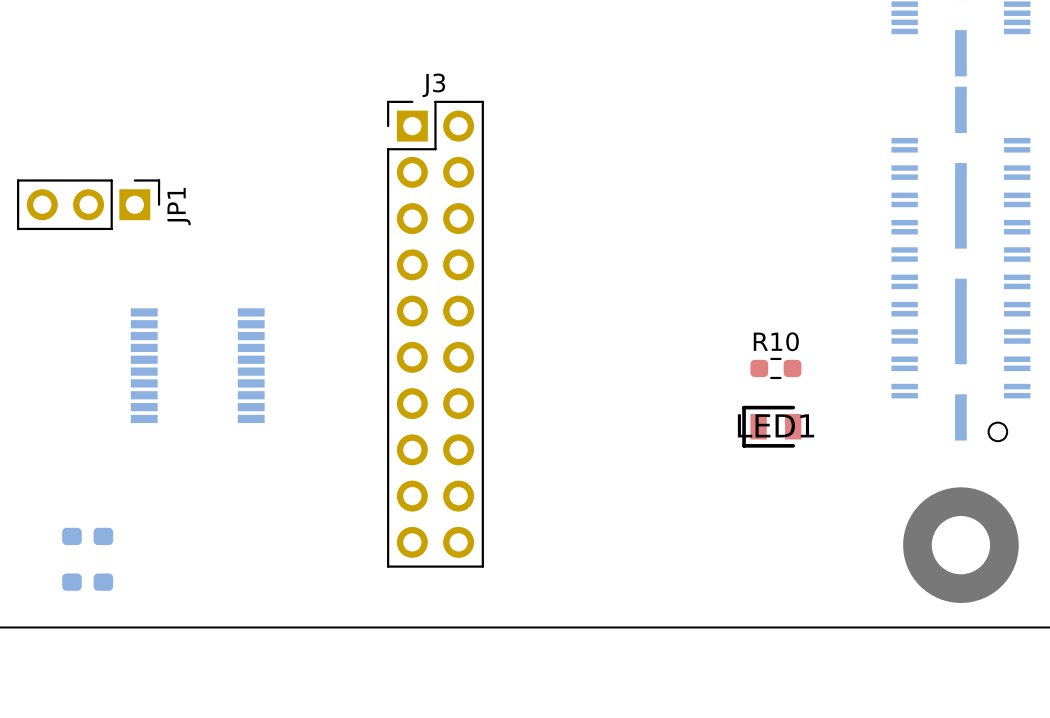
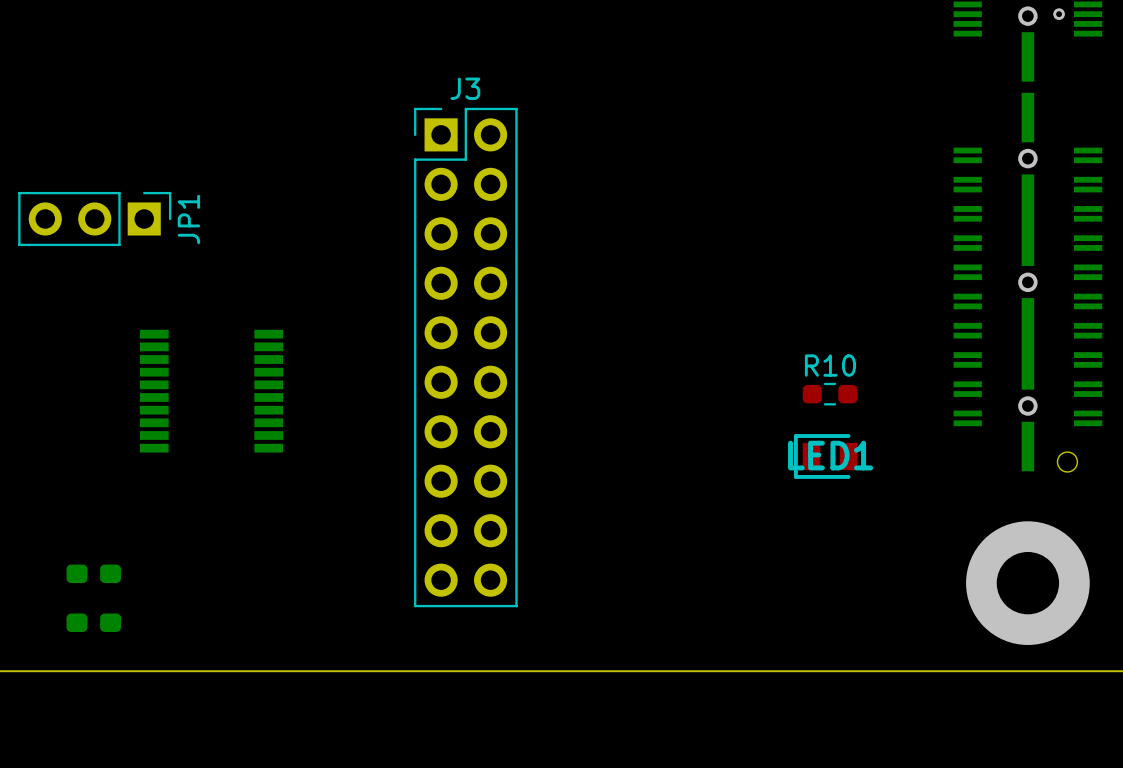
via: none -> (1059, 14)
via: none -> (1027, 16)
via: none -> (1027, 158)
via: none -> (1027, 282)
via: none -> (1027, 406)

